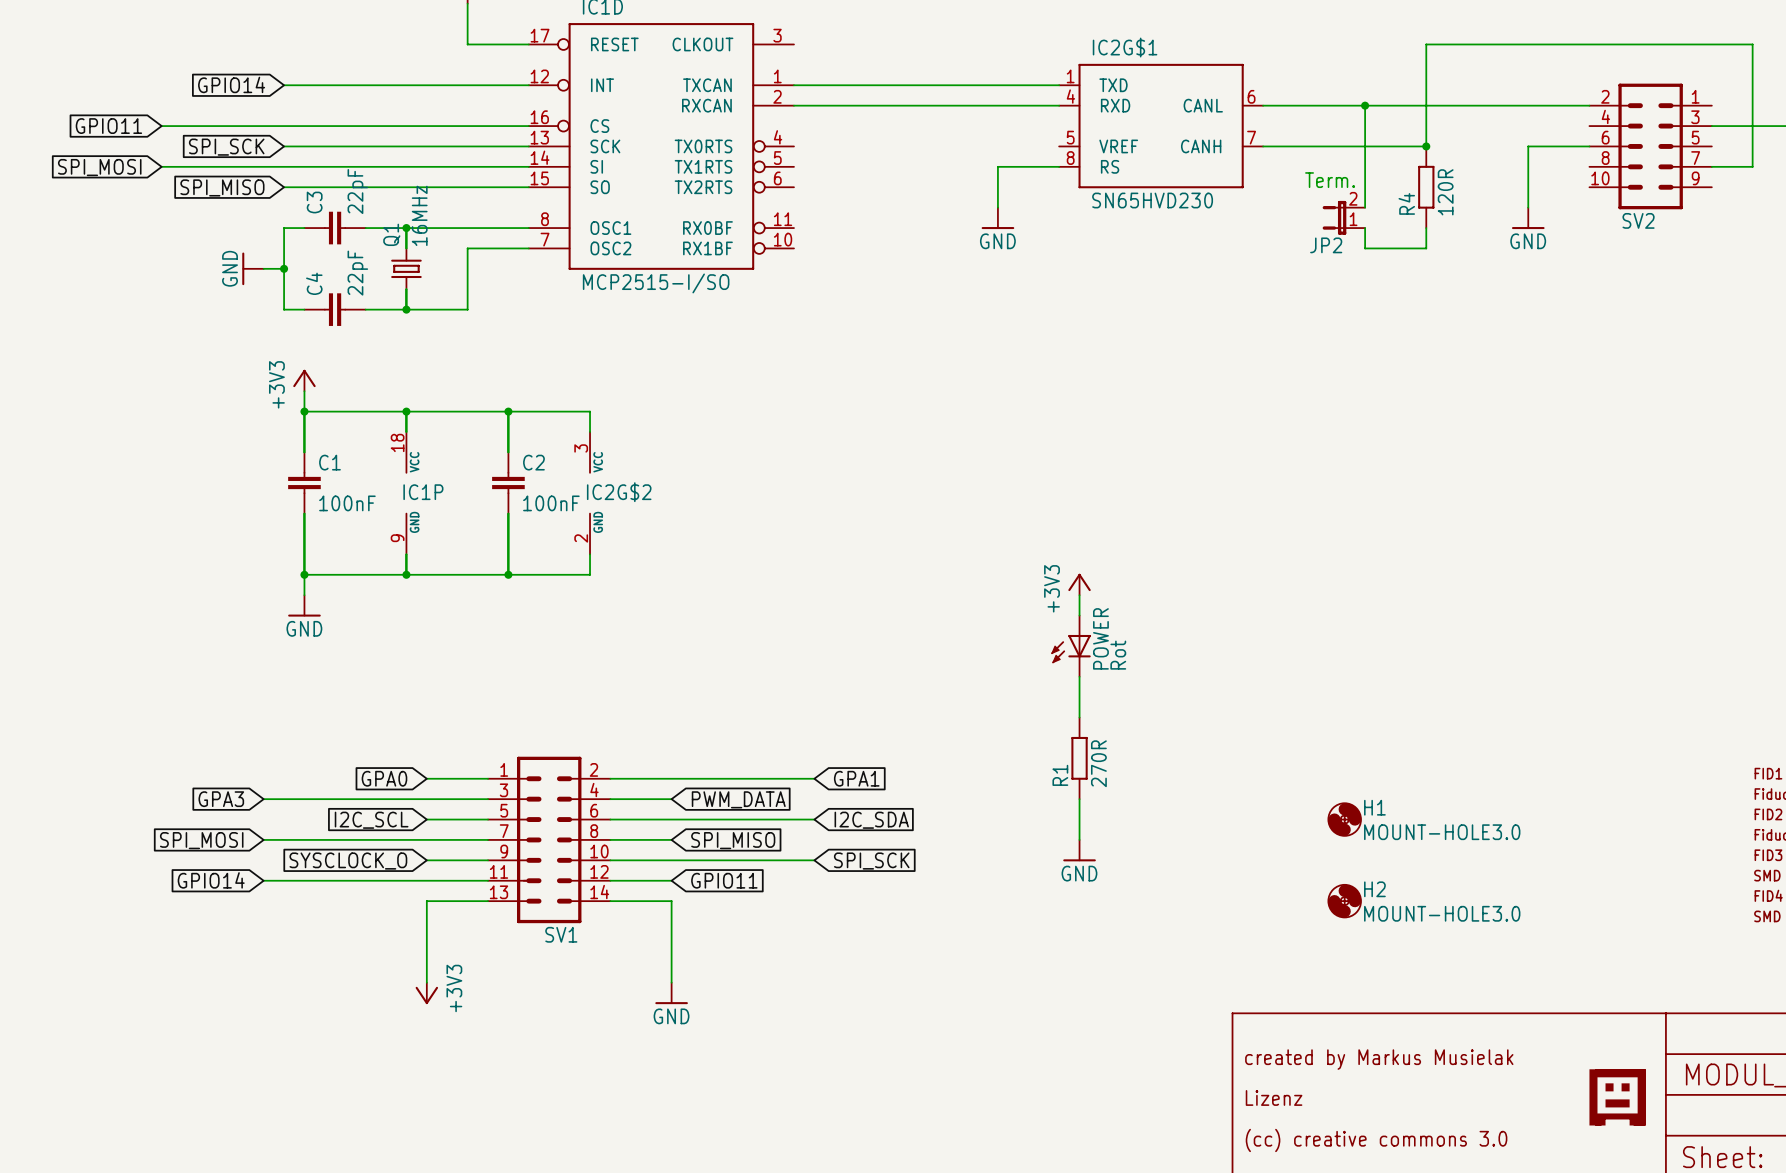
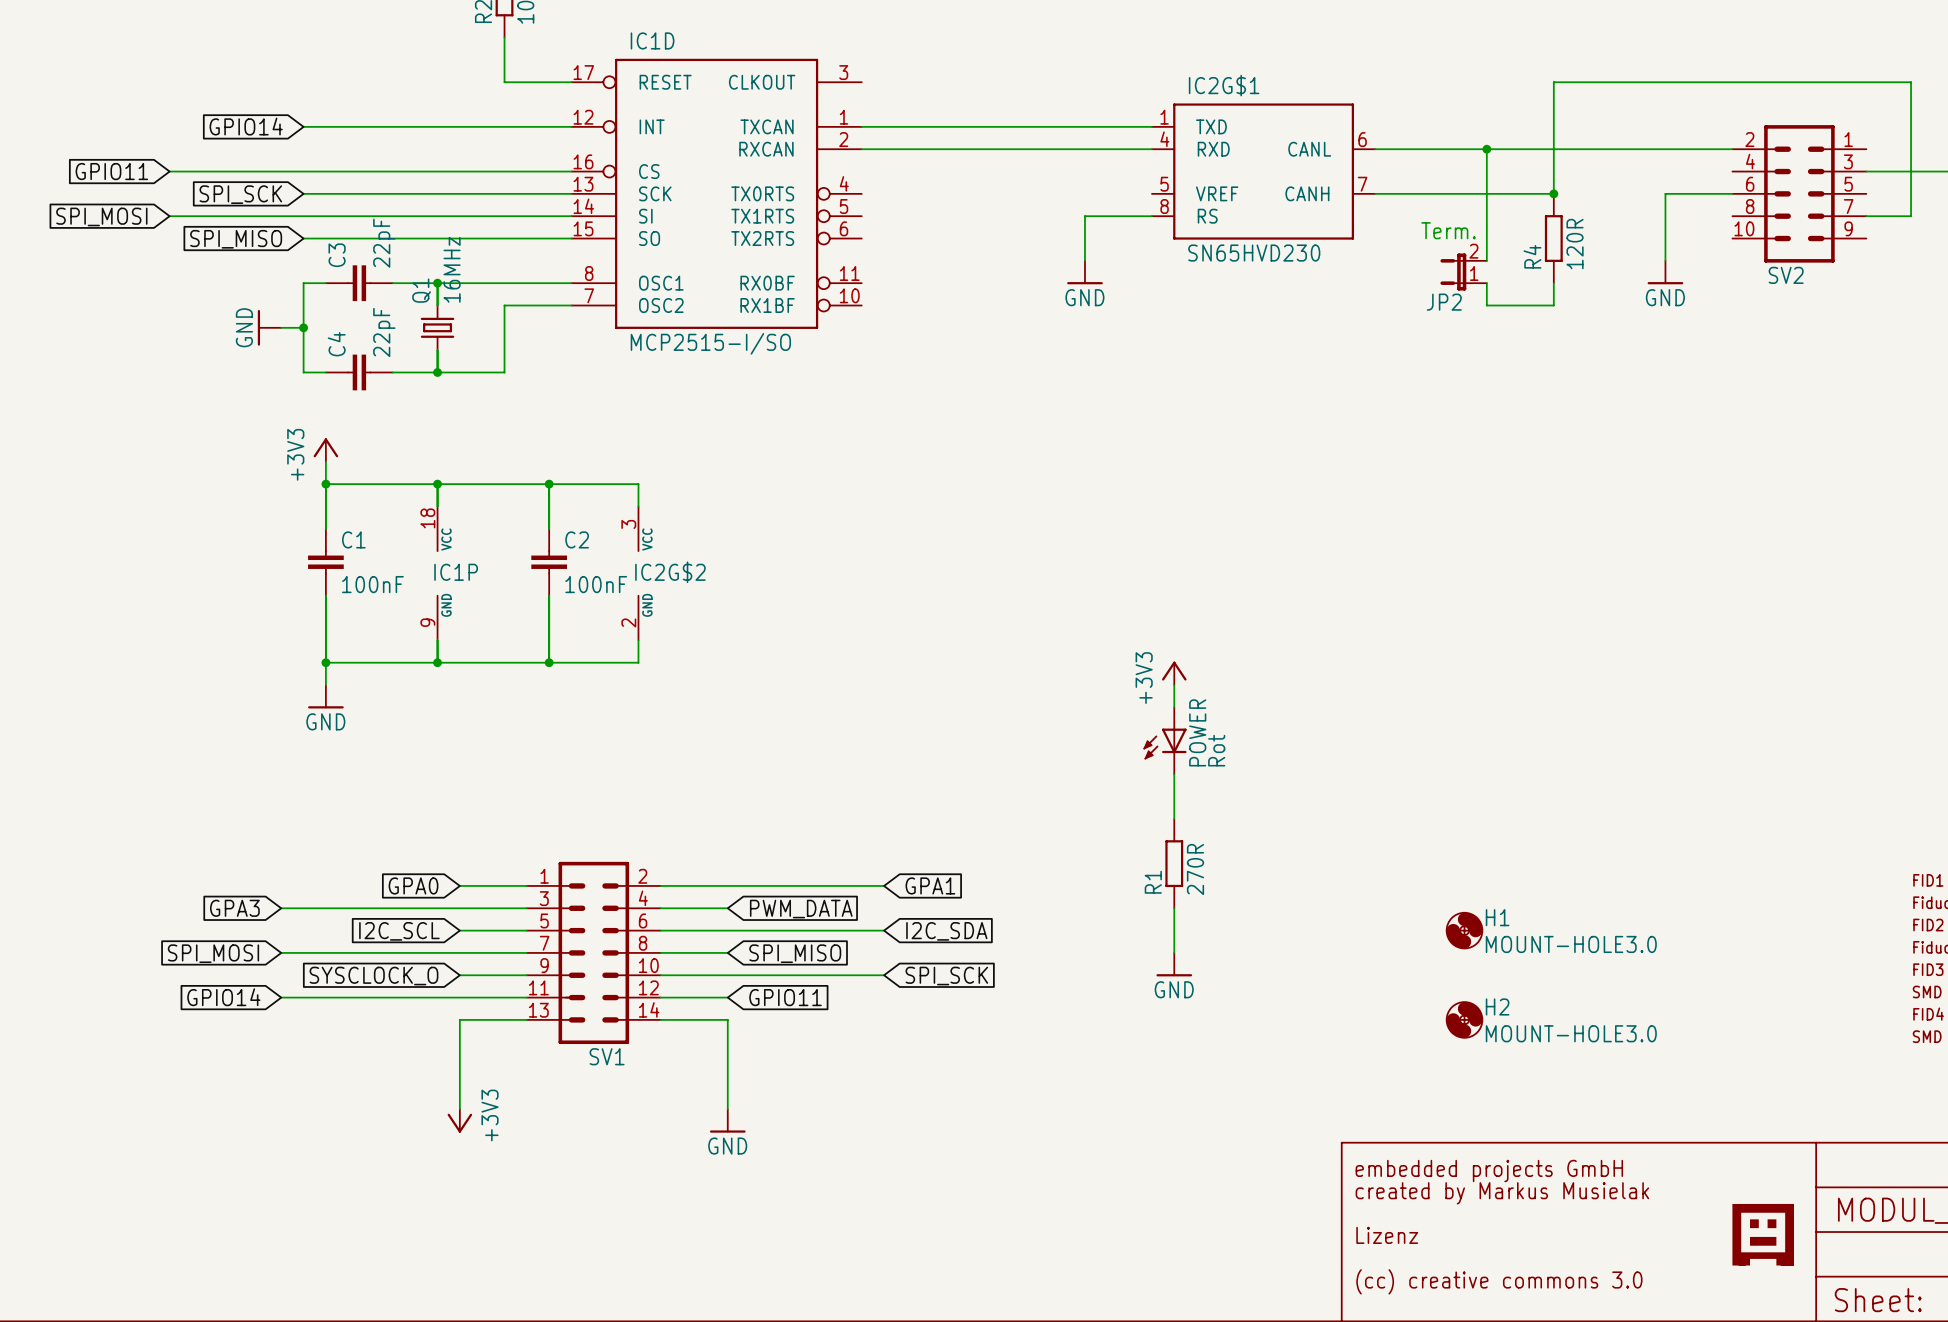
text: none -> embedded projects GmbH (1489, 1170)

